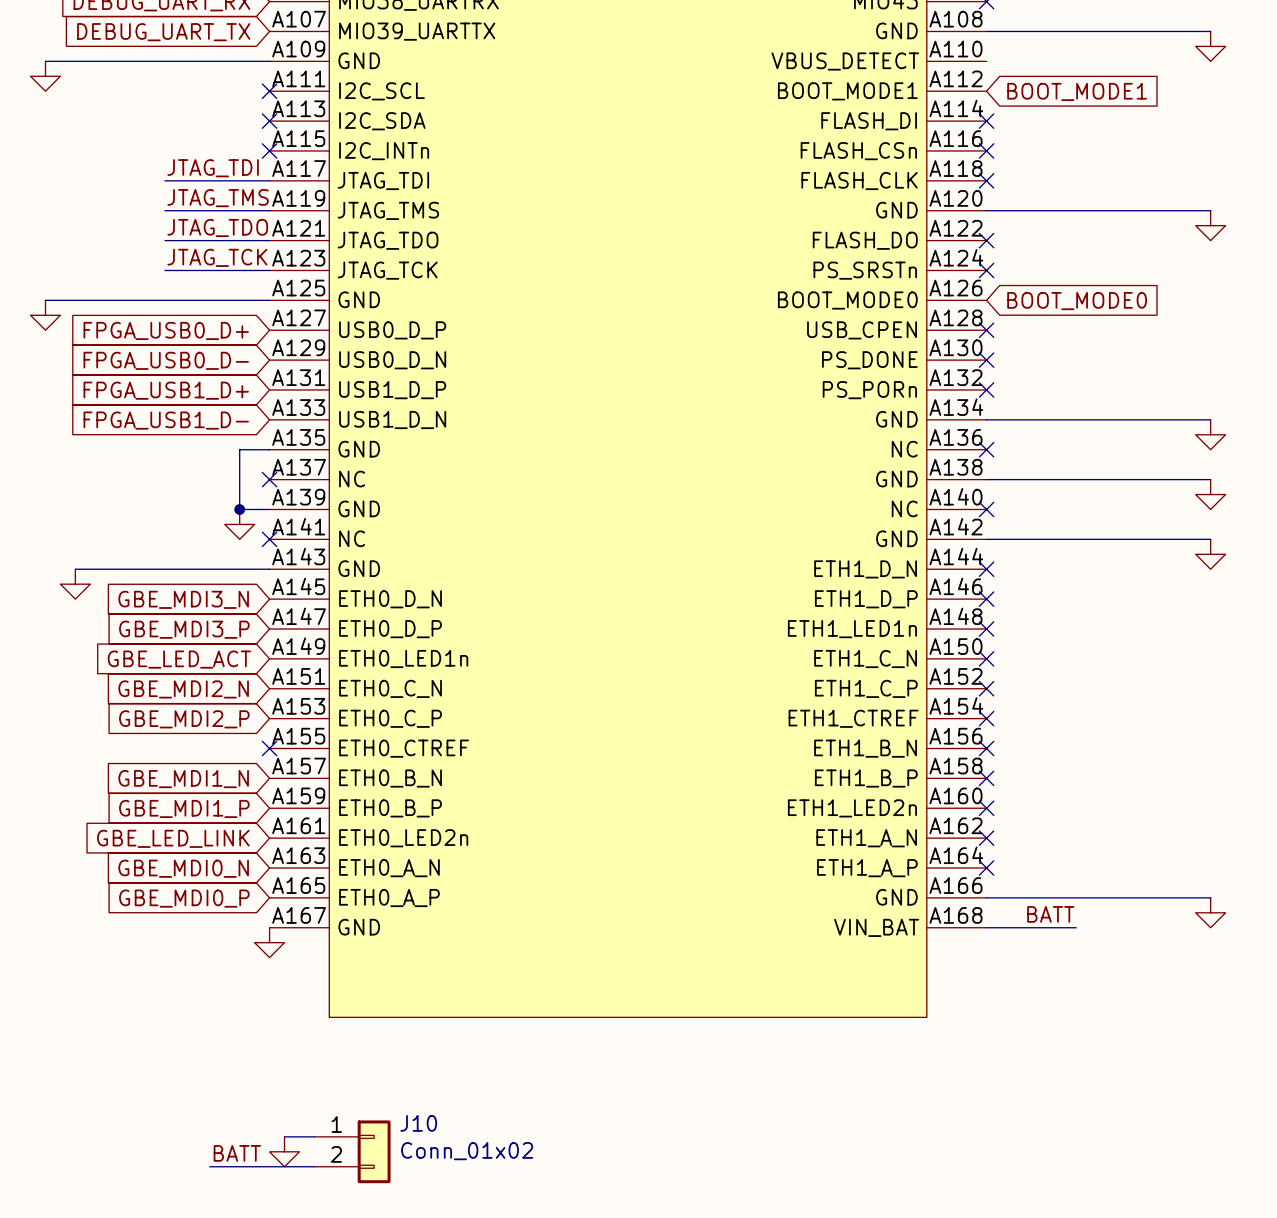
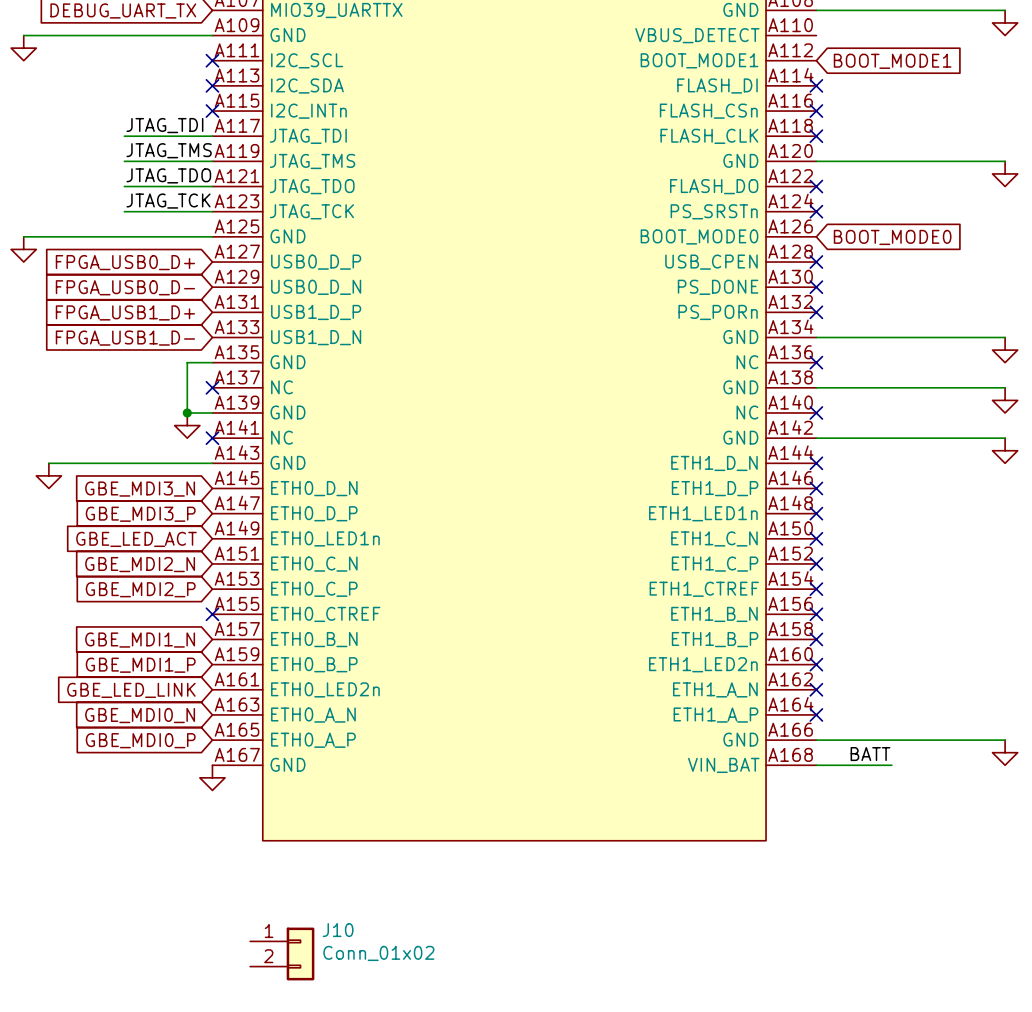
wire: (284, 1136) (314, 1136) -> none
power symbol: (284, 1151) -> none
label: BATT (237, 1153) -> none
wire: (209, 1166) (314, 1166) -> none

